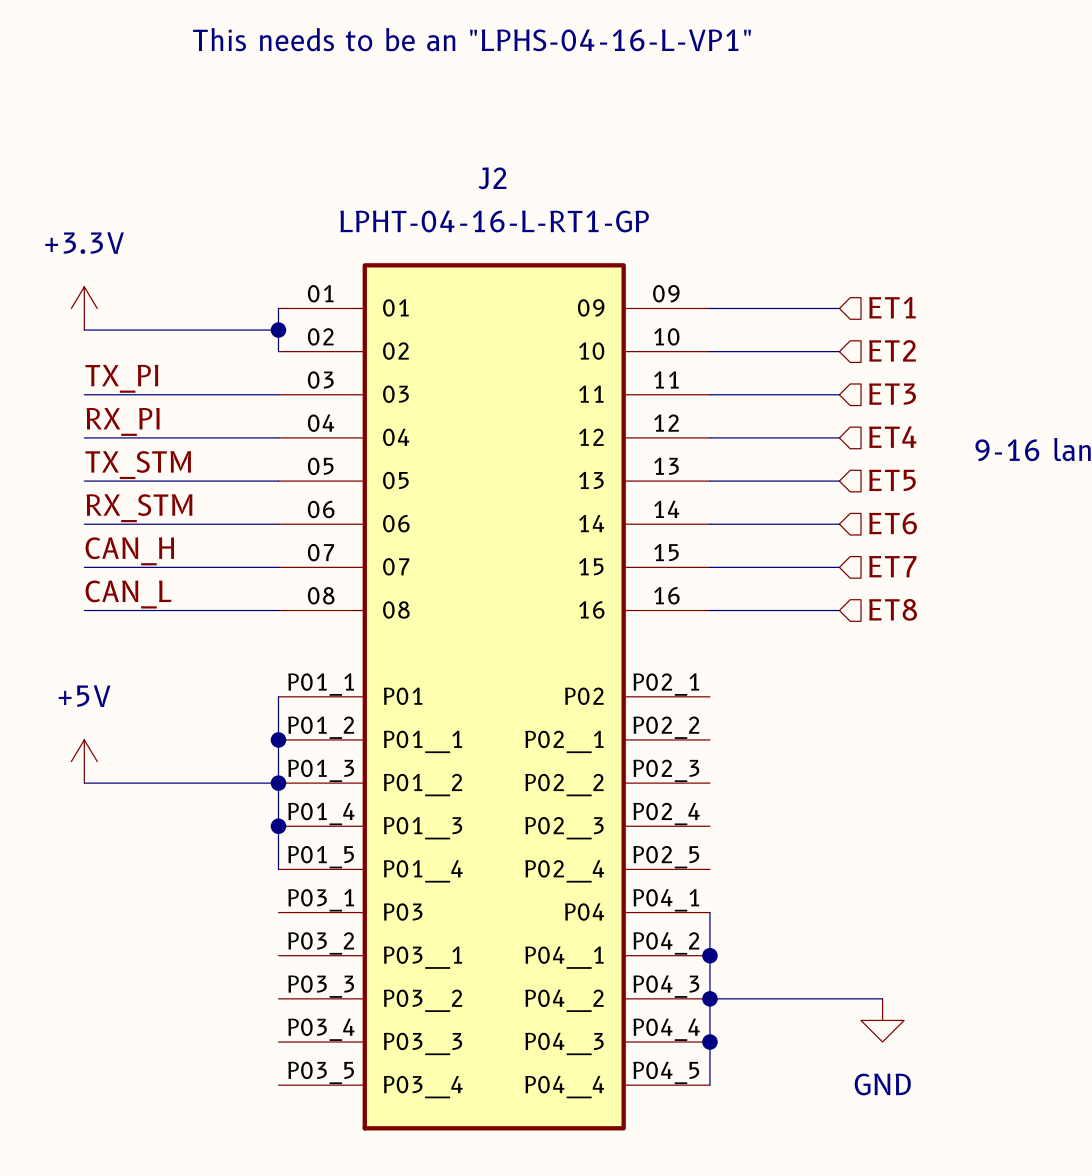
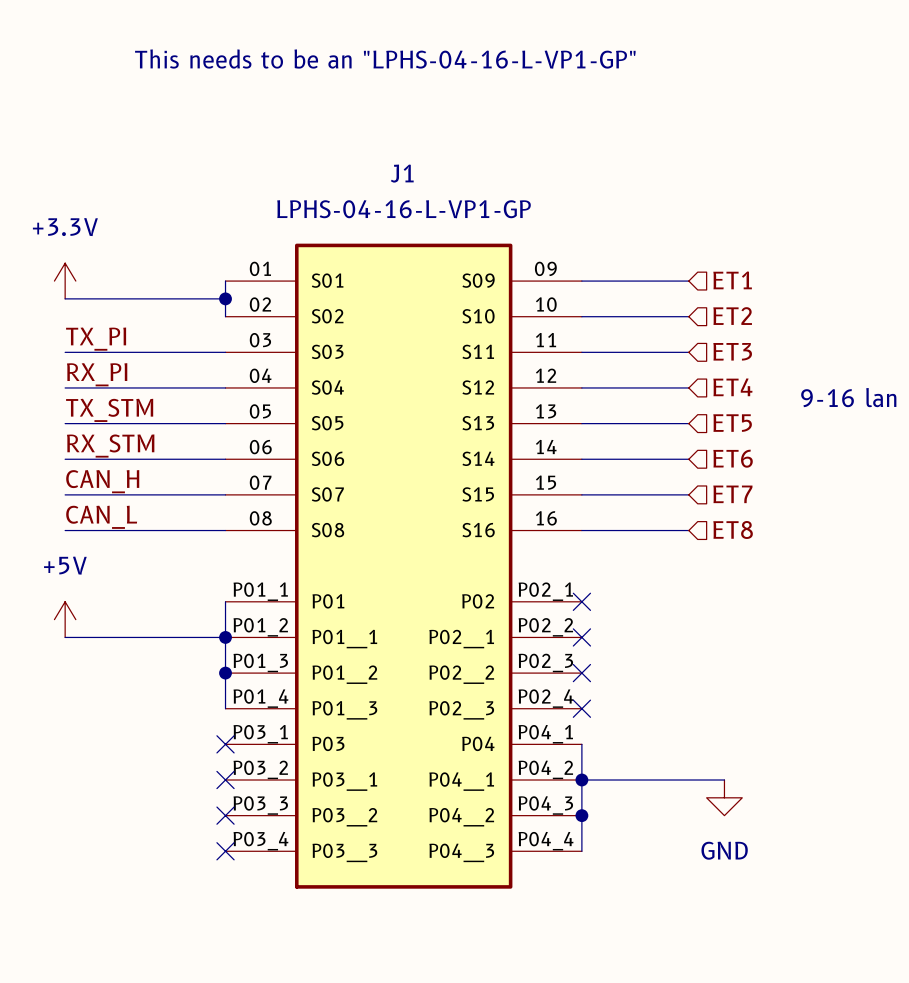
text: This needs to be an "LPHS-04-16-L-VP1" (471, 39) -> This needs to be an "LPHS-04-16-L-VP1-GP" (385, 59)
J1: none -> LPHS-04-16-L-VP1-GP (403, 566)
J2: LPHT-04-16-L-RT1-GP (494, 696) -> none
no-connect mark: none -> (581, 601)
no-connect mark: none -> (581, 637)
power symbol position: +5V (84, 761) -> +5V (65, 619)
wire: (84, 783) (278, 783) -> (65, 637) (225, 637)
no-connect mark: none -> (581, 673)
wire: (278, 826) (278, 869) -> none
junction: (278, 826) -> none
no-connect mark: none -> (581, 708)
no-connect mark: none -> (225, 744)
wire: none -> (581, 744) (581, 780) (724, 780)
no-connect mark: none -> (225, 780)
junction: none -> (581, 780)
no-connect mark: none -> (225, 815)
no-connect mark: none -> (225, 851)
junction: (709, 998) -> none
wire: (882, 998) (709, 998) (709, 1085) -> none
power symbol position: GND (882, 1020) -> GND (724, 797)
junction: (709, 1042) -> none

